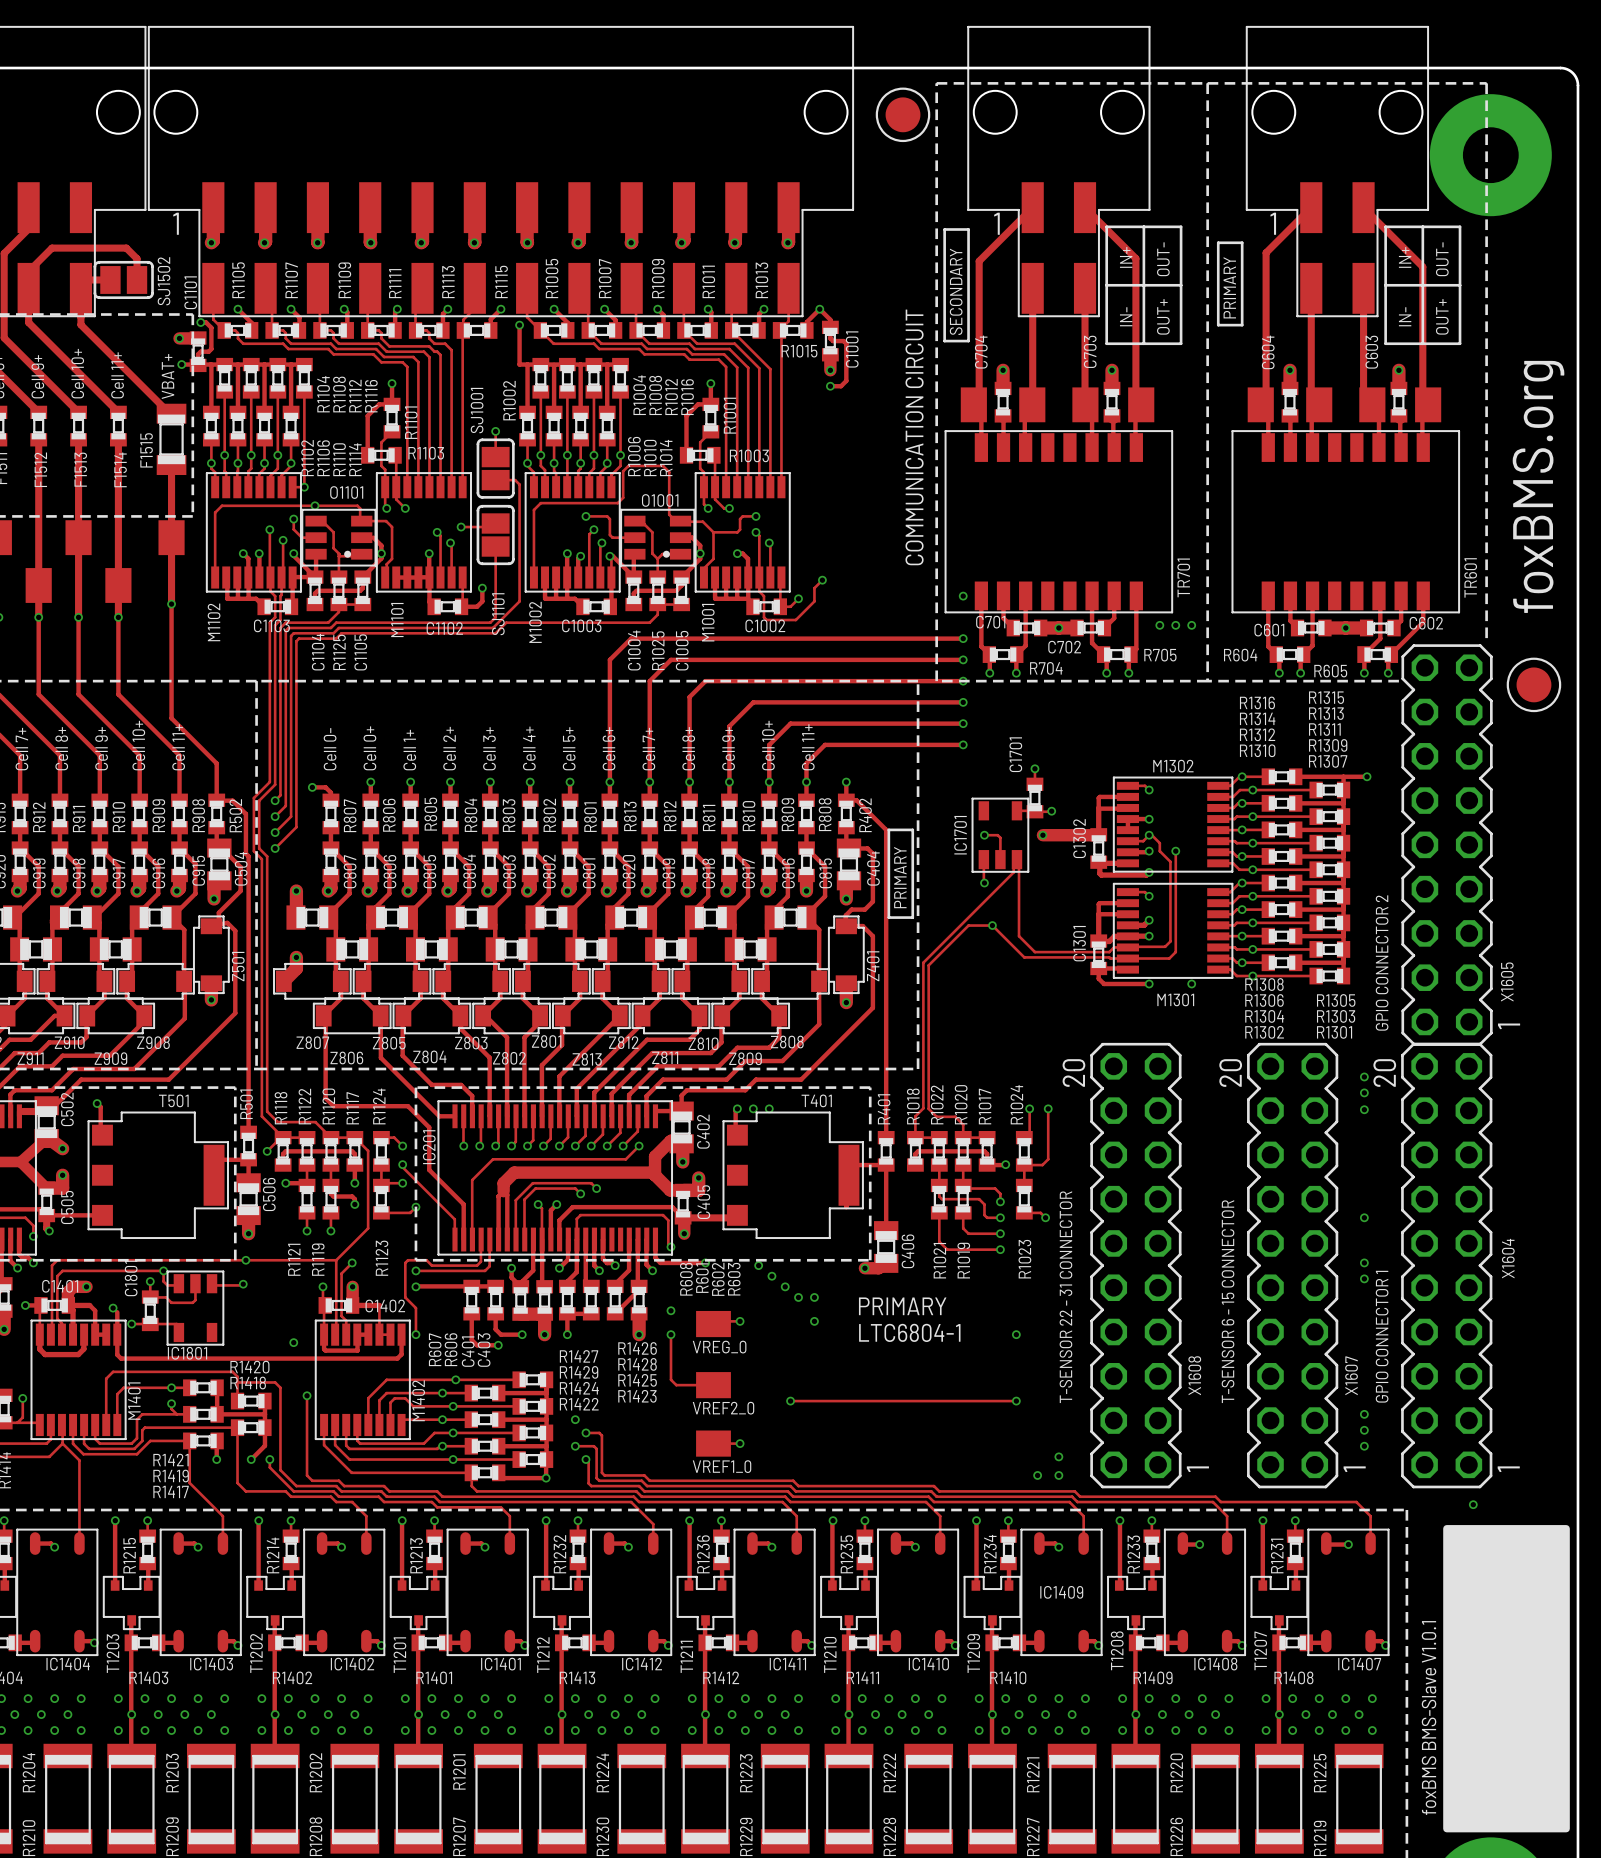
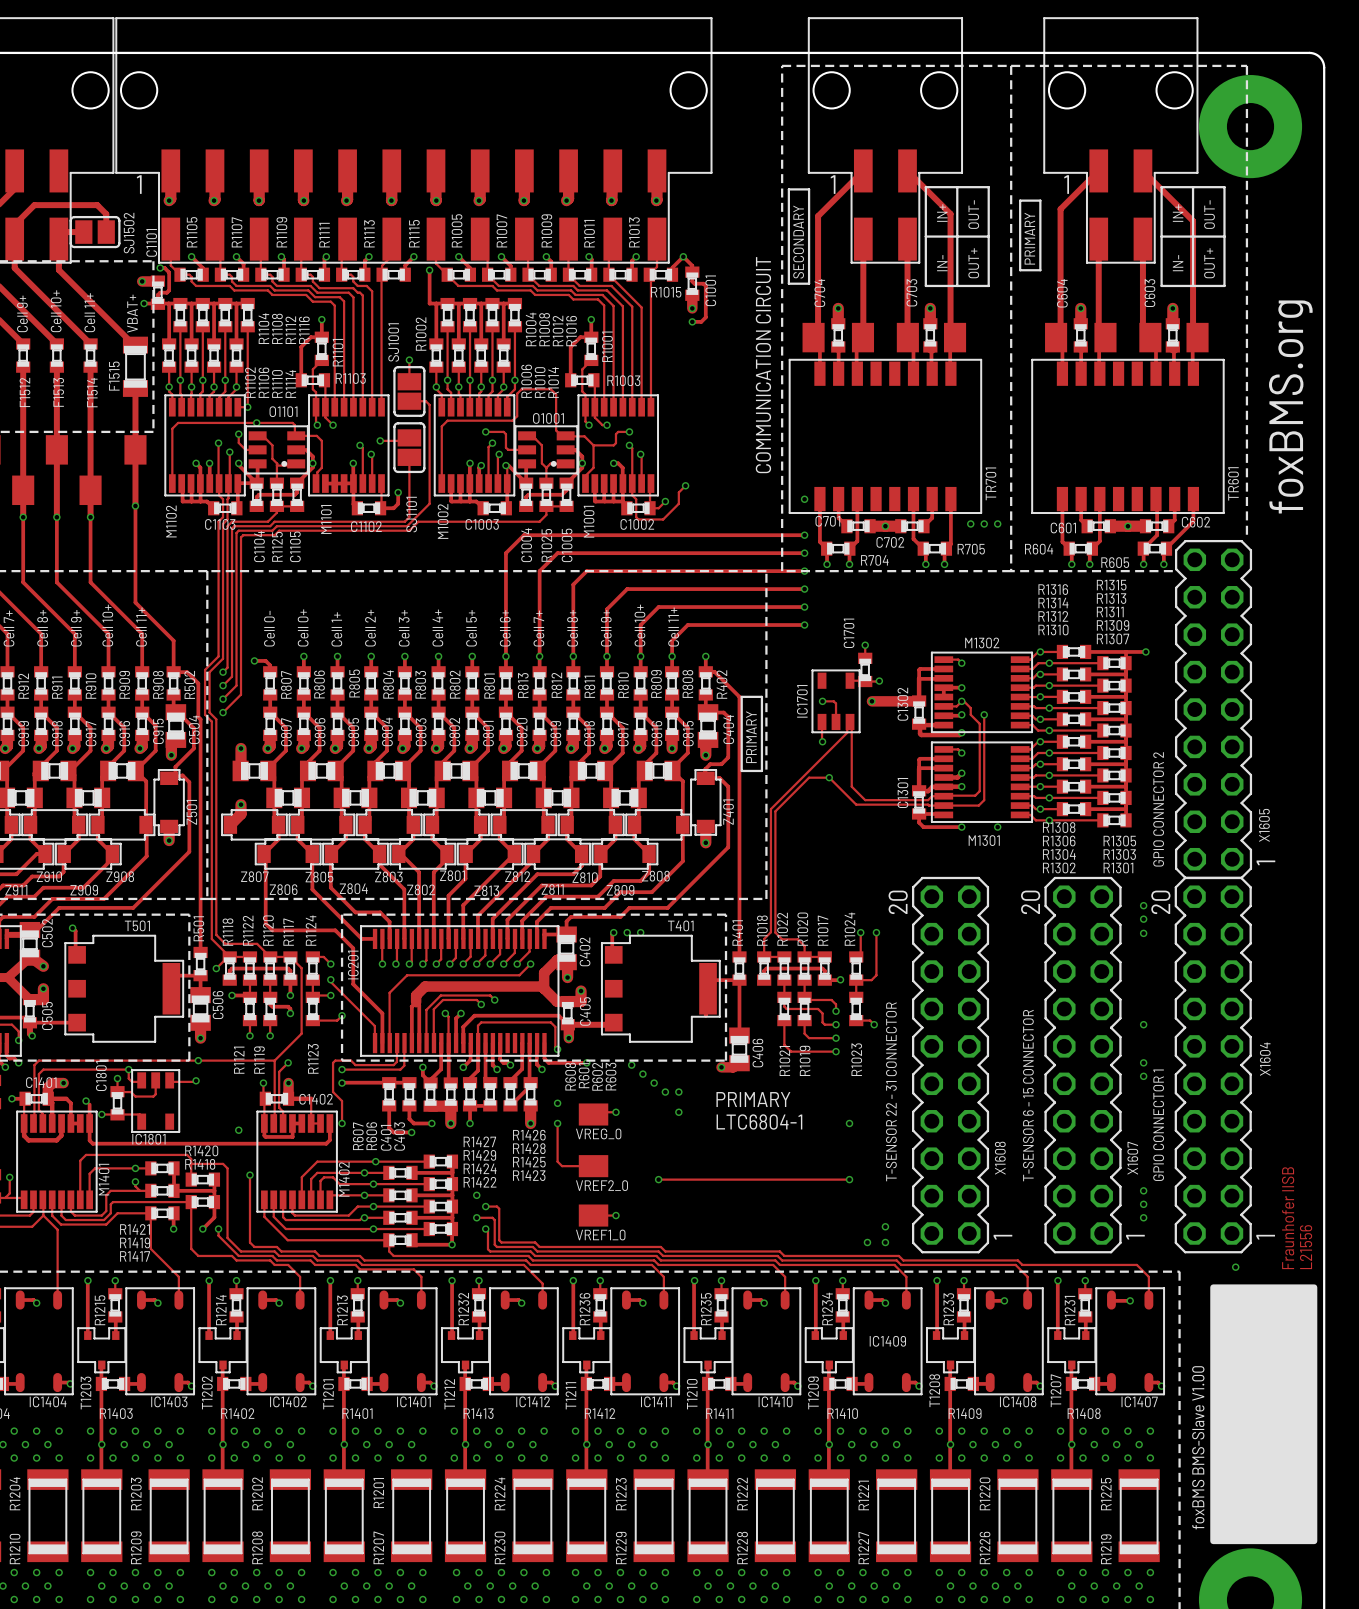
drawing: [875, 87, 931, 143] -> none
drawing: [1506, 657, 1562, 713] -> none
text: none -> Fraunhofer IISB (1288, 1218)
text: none -> L21556 (1306, 1247)
text: foxBMS BMS-Slave V1.0.1 (1429, 1717) -> foxBMS BMS-Slave V1.00 (1198, 1447)

